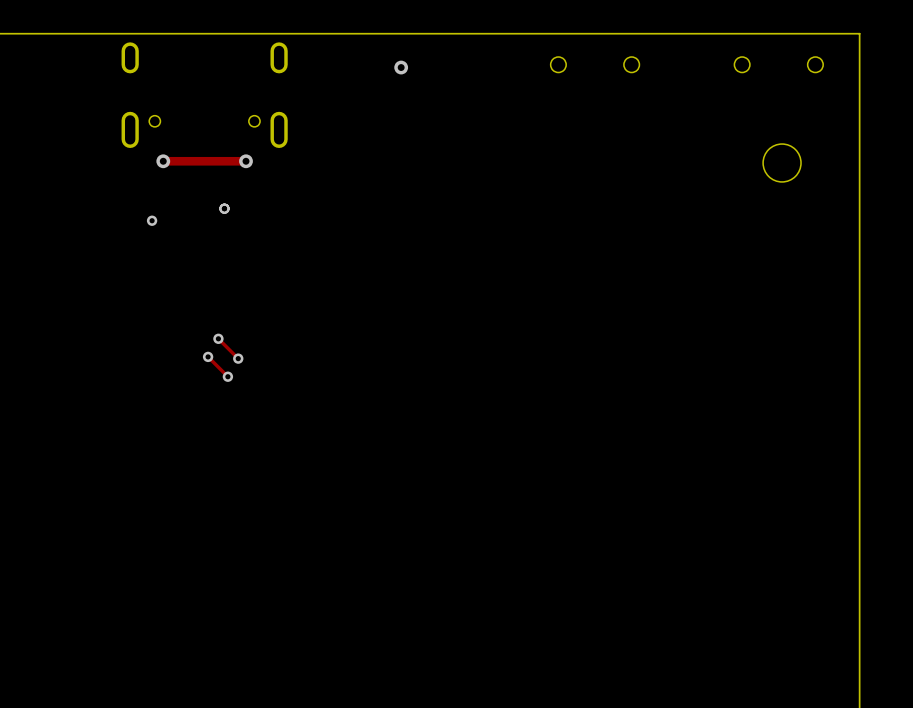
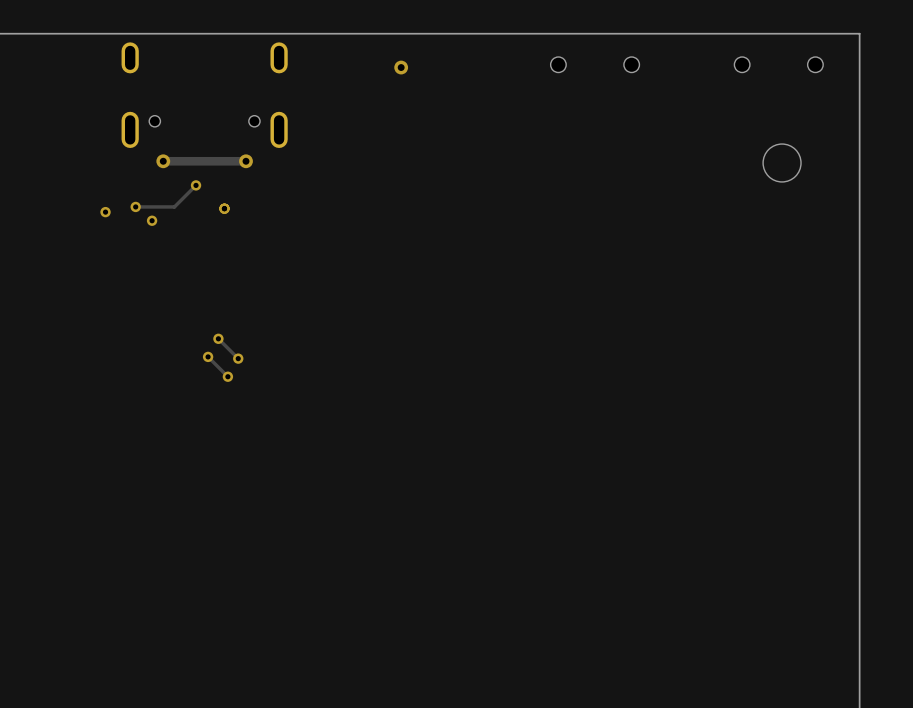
track: none -> (196, 185) (174, 206) (135, 206)
via: none -> (196, 185)
via: none -> (135, 206)
via: none -> (105, 212)

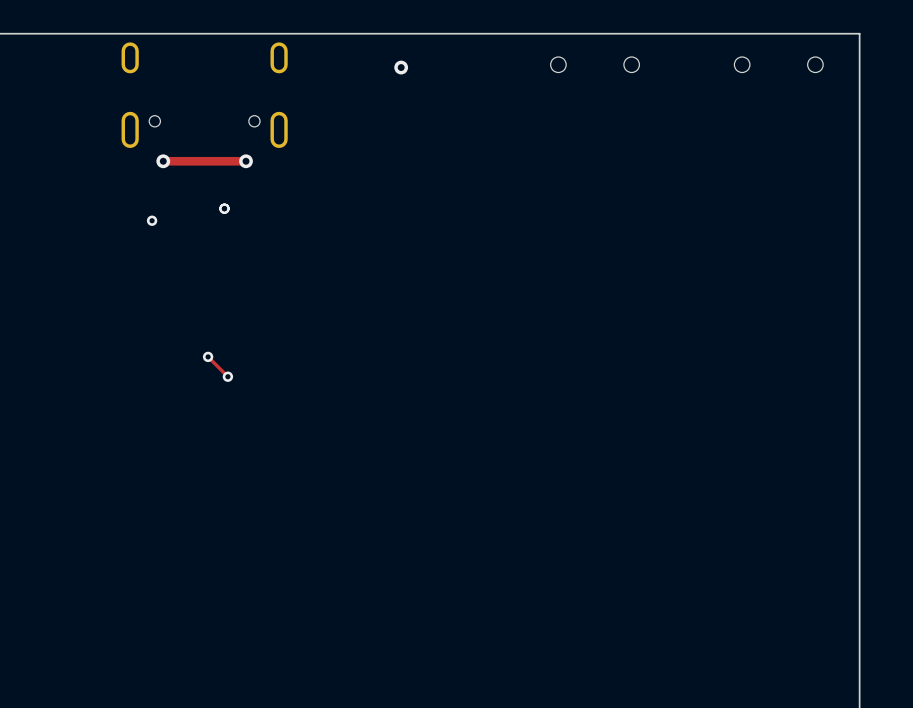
round board edge: [762, 143, 802, 183] -> none
track: (196, 185) (174, 206) (135, 206) -> none
via: (196, 185) -> none
via: (135, 206) -> none
via: (105, 212) -> none
track: (218, 338) (238, 358) -> none
via: (218, 338) -> none
via: (238, 358) -> none

